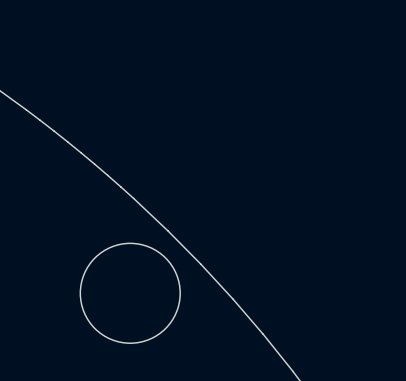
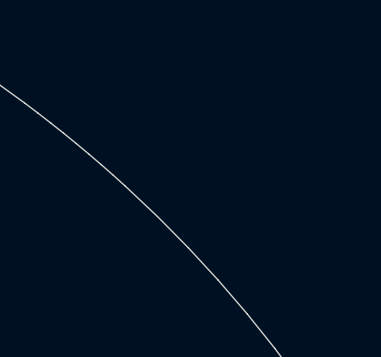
round board edge: [79, 242, 181, 344] -> none

